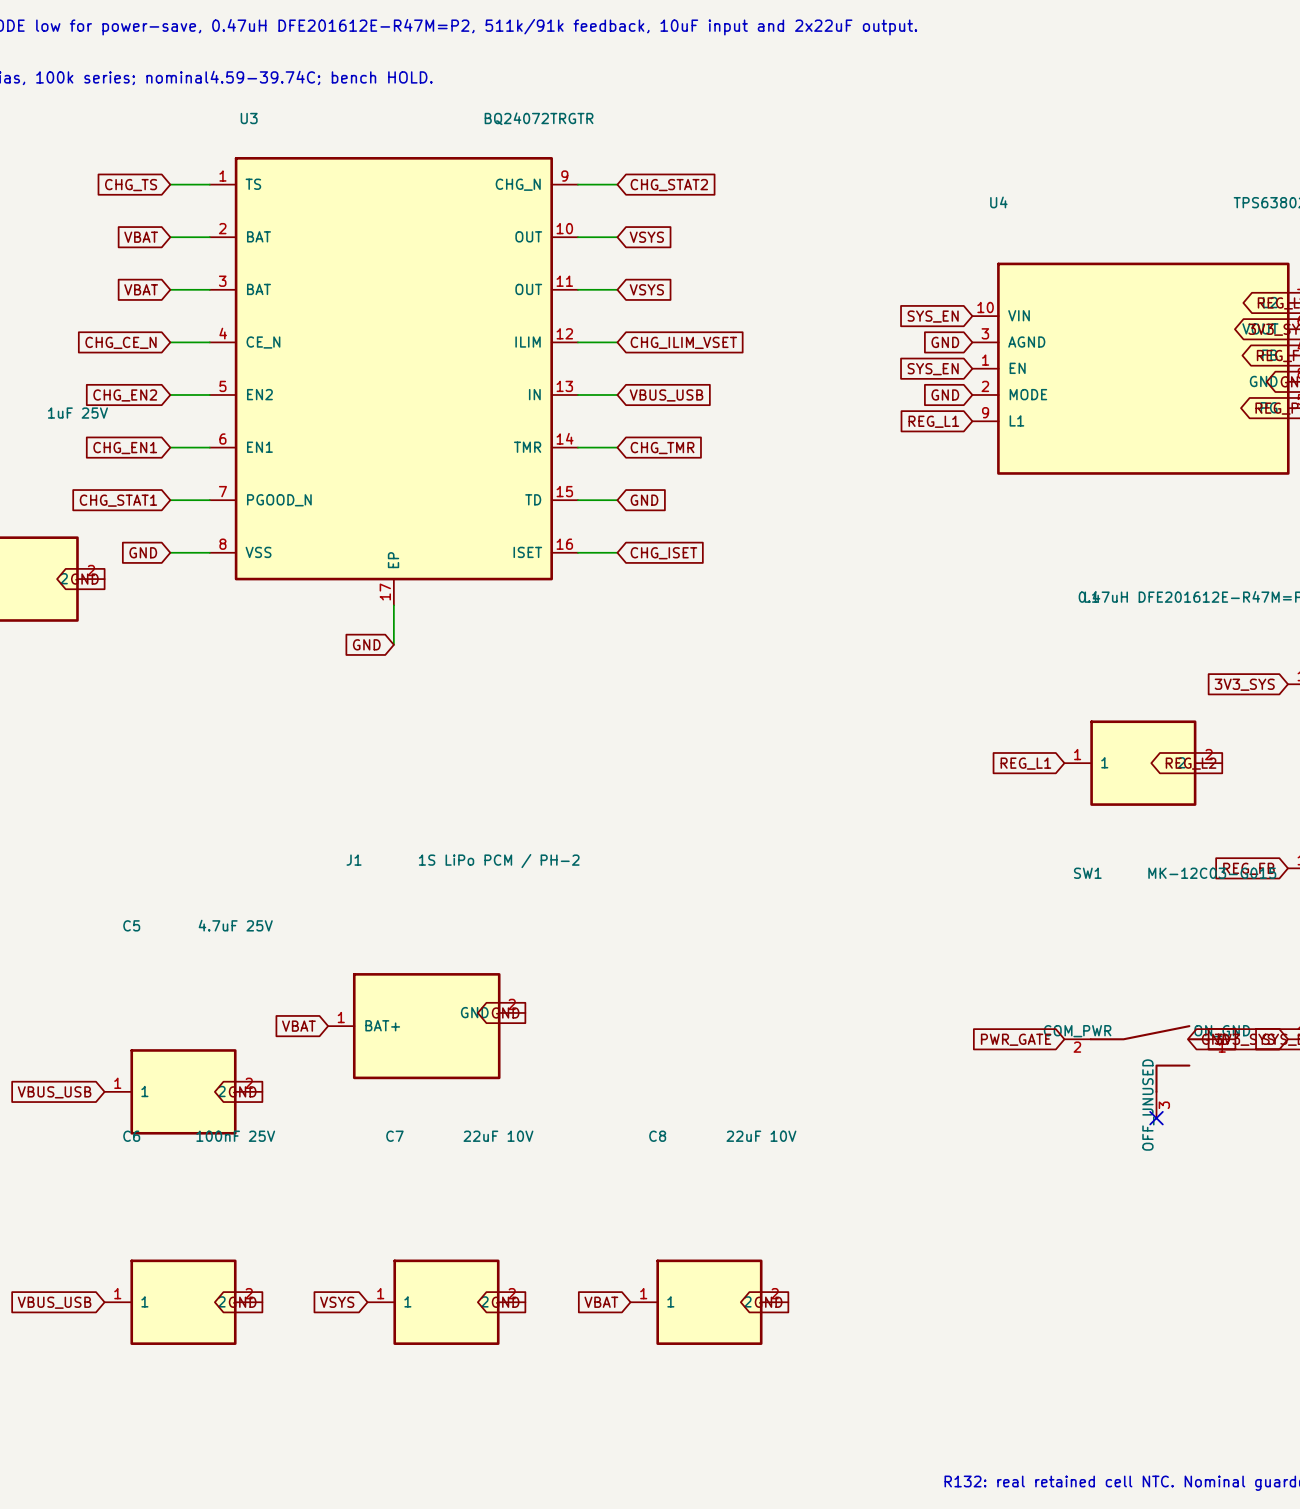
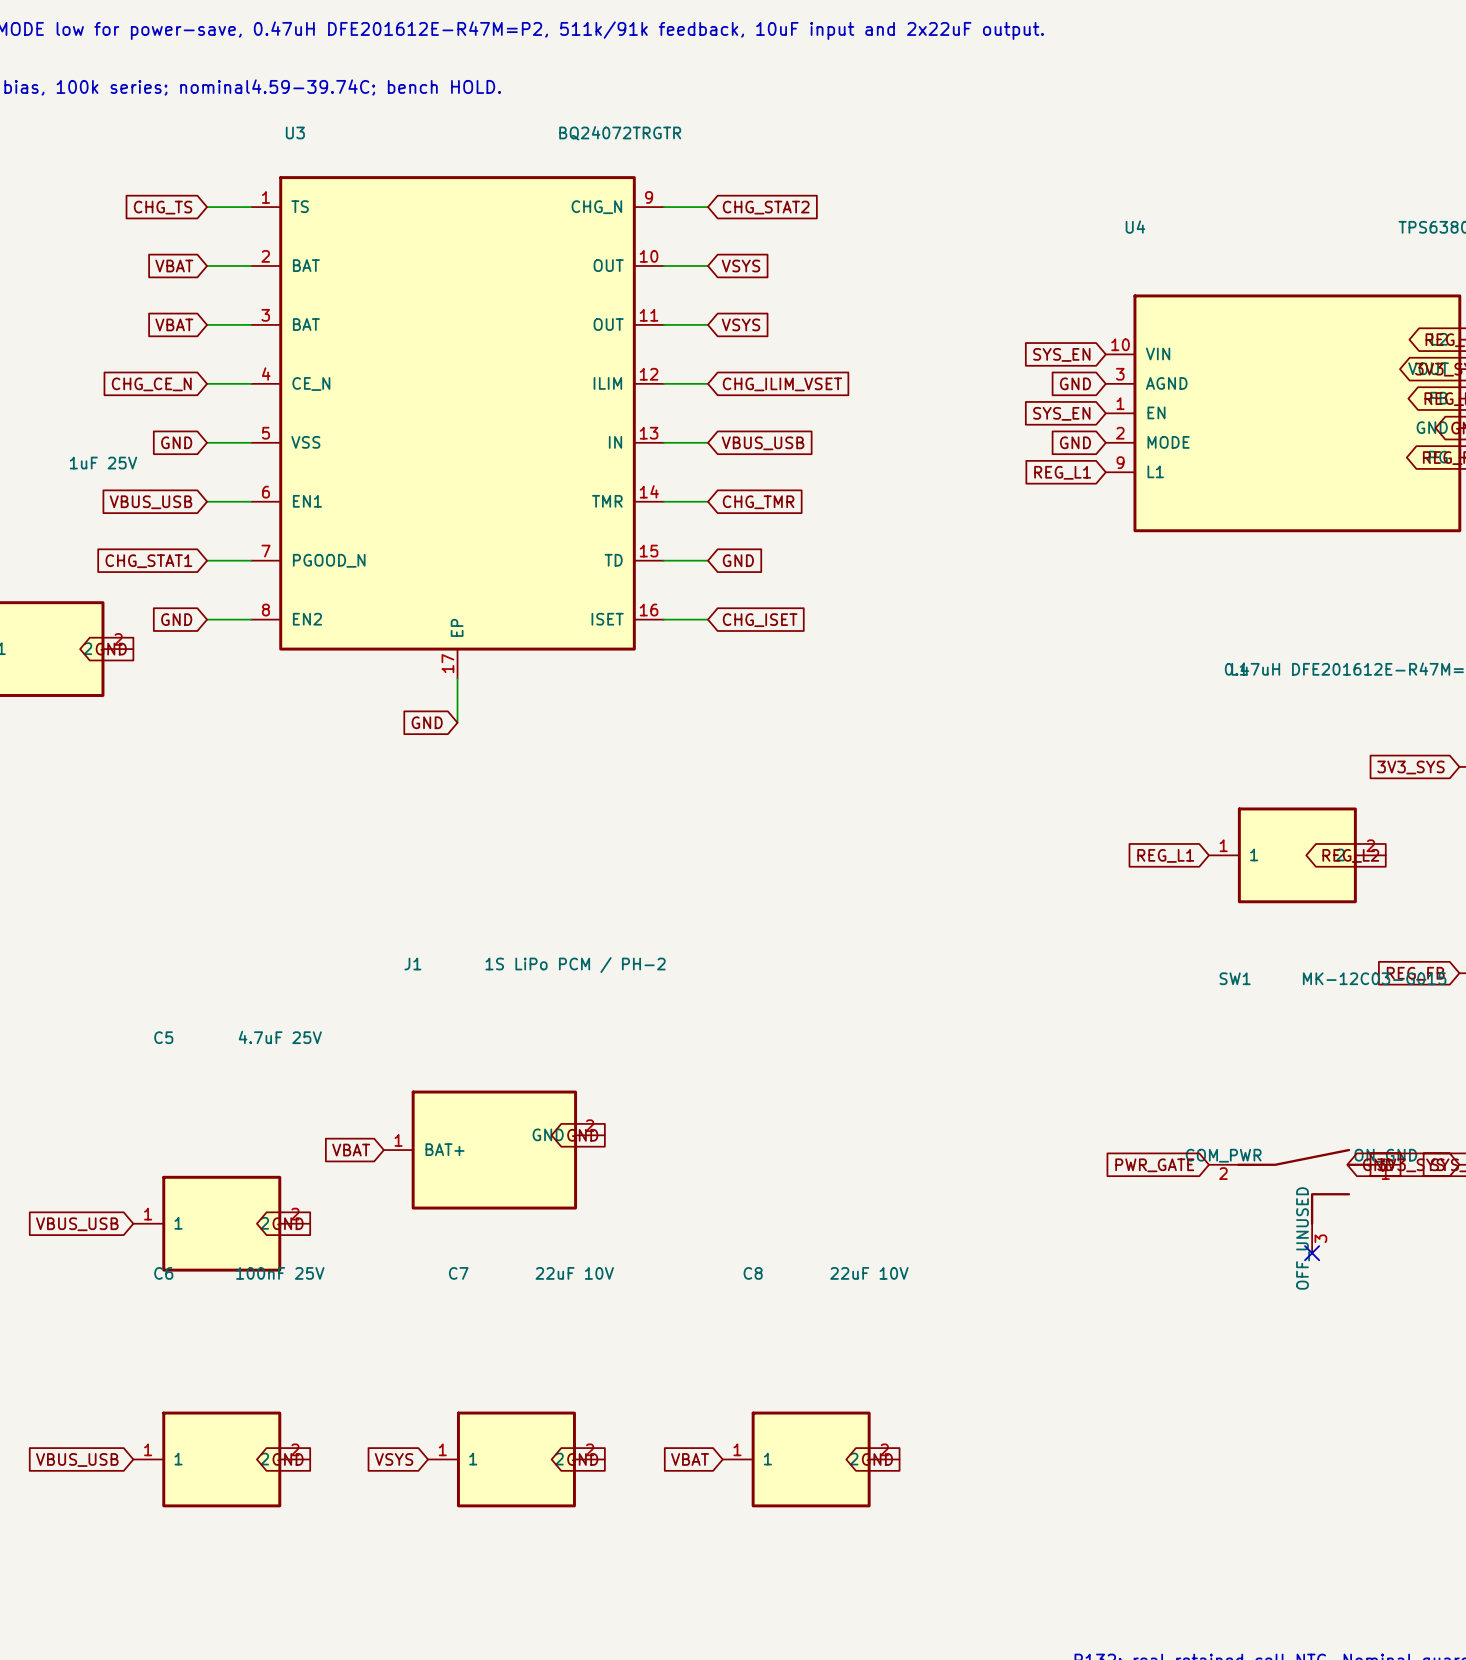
U3 pin name: EN2 (259, 394) -> VSS (305, 442)
global label: CHG_EN2 (125, 395) -> GND (176, 442)
global label: CHG_EN1 (125, 448) -> VBUS_USB (150, 502)
U3 pin name: VSS (258, 552) -> EN2 (307, 619)

